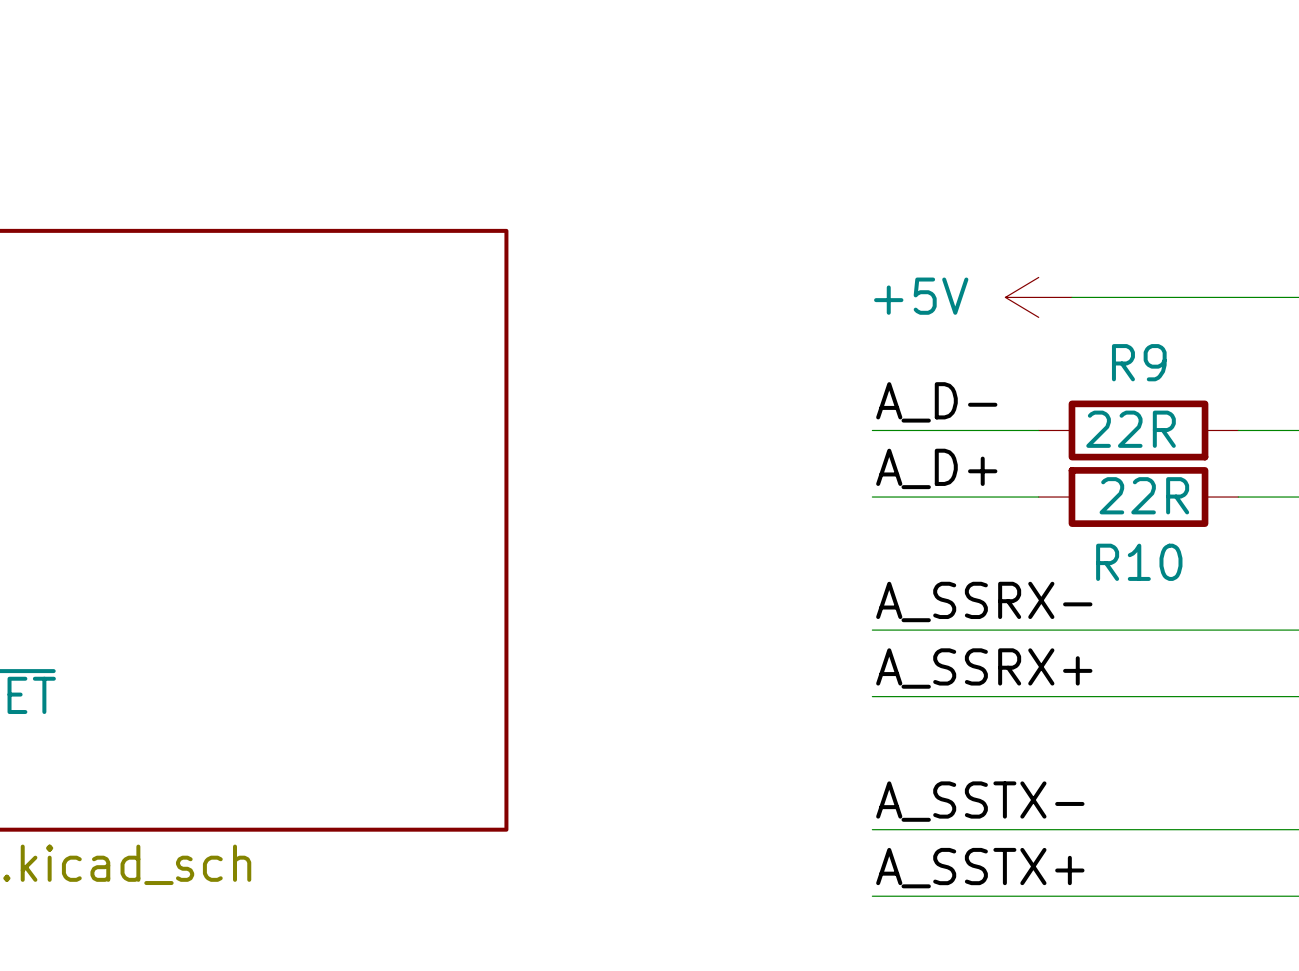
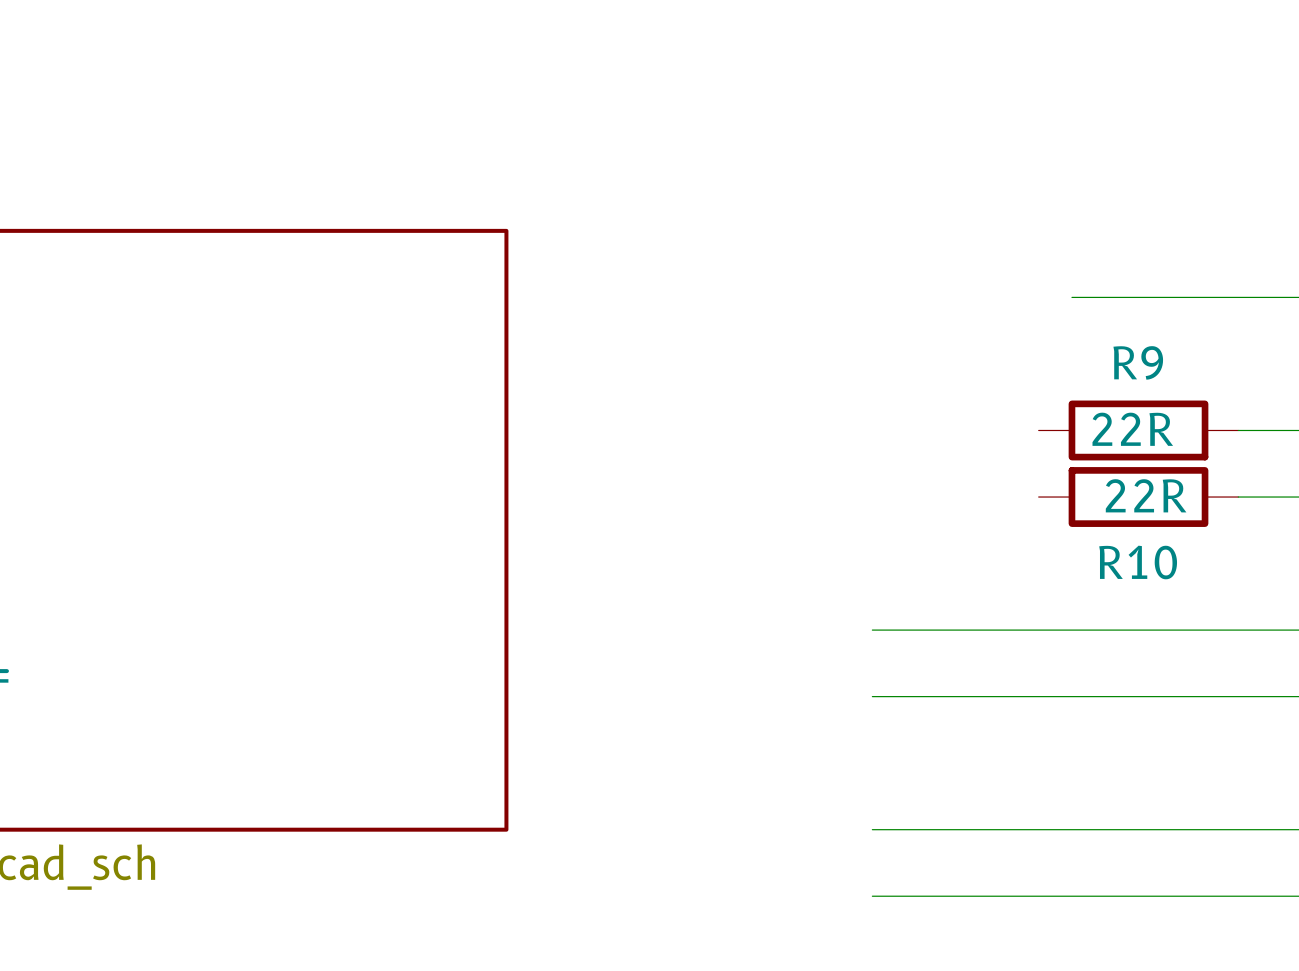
power symbol: +5V (1038, 297) -> none
label: A_D- (936, 402) -> none
wire: (872, 430) (1038, 430) -> none
label: A_D+ (936, 468) -> none
wire: (872, 497) (1038, 497) -> none
label: A_SSRX- (984, 601) -> none
label: A_SSRX+ (984, 668) -> none
label: A_SSTX- (980, 801) -> none
label: A_SSTX+ (980, 868) -> none

